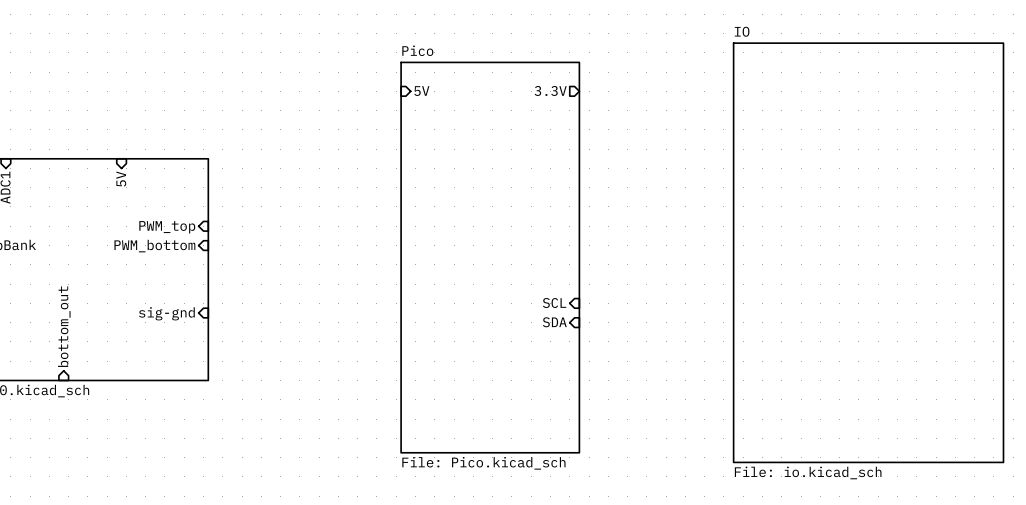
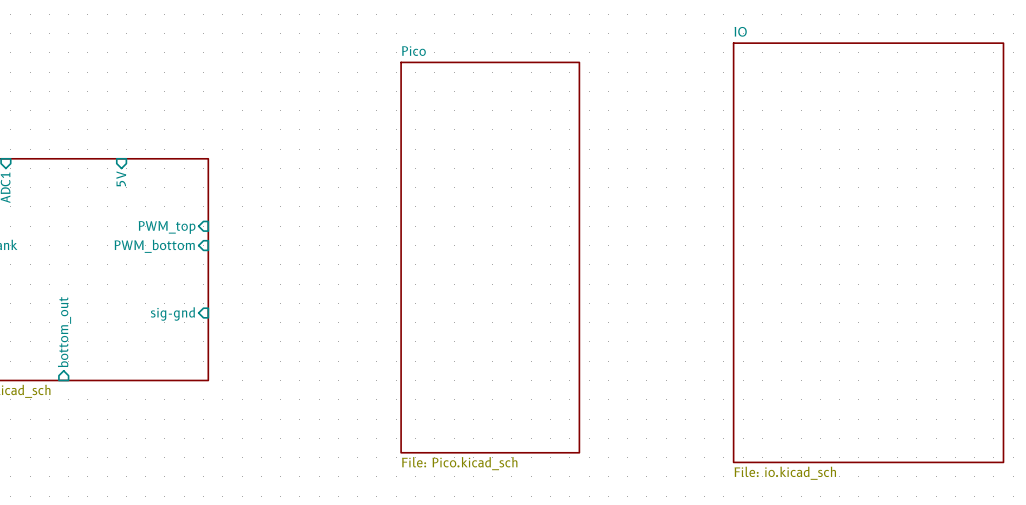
sheet pin: 3.3V (550, 90) -> none
sheet pin: 5V (421, 91) -> none
sheet pin: SCL (554, 303) -> none
sheet pin: SDA (554, 322) -> none

